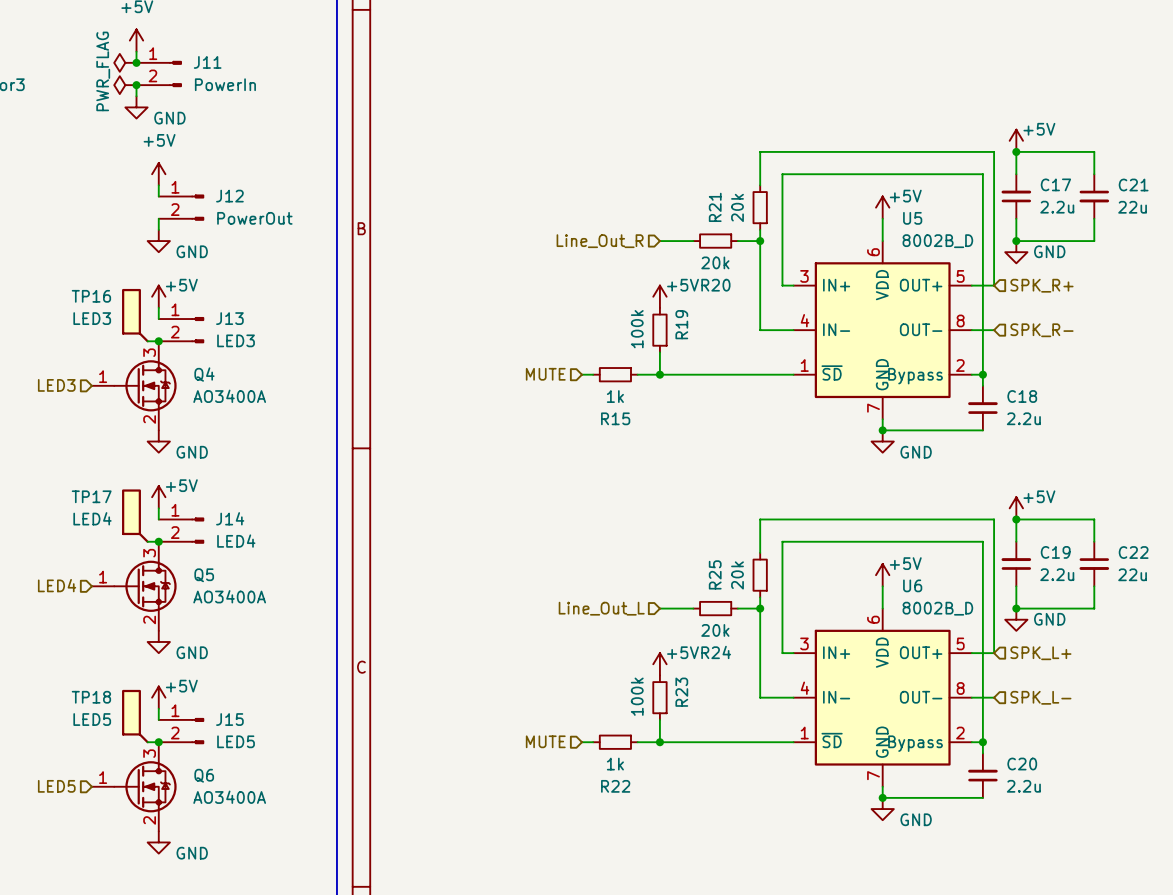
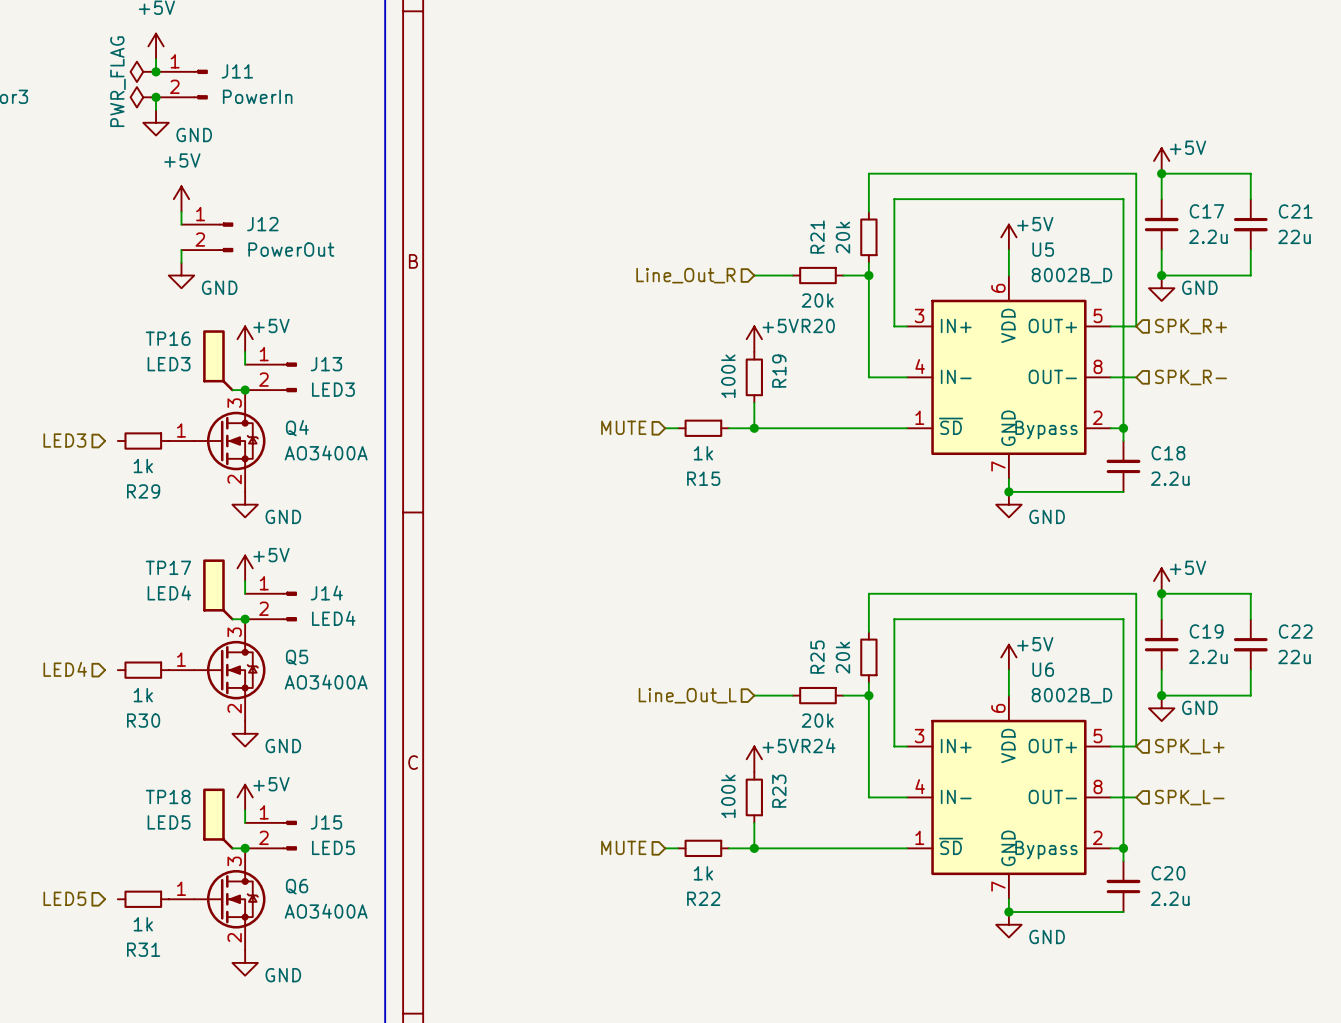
power symbol position: +5V (158, 296) -> +5V (245, 339)
wire: (158, 307) (158, 319) -> (245, 351) (245, 364)
TP16 position: (135, 315) -> (218, 360)
J13 position: (181, 330) -> (270, 377)
wire: (147, 341) (158, 341) -> (232, 390) (245, 390)
junction: (158, 341) -> none
junction: none -> (245, 390)
R29: none -> 1k (143, 441)
Q4 position: (134, 385) -> (217, 441)
power symbol position: GND (158, 441) -> GND (245, 504)
power symbol position: +5V (158, 497) -> +5V (245, 568)
wire: (158, 508) (158, 519) -> (245, 581) (245, 593)
TP17 position: (135, 516) -> (218, 589)
J14 position: (181, 530) -> (270, 606)
wire: (147, 541) (158, 541) -> (232, 619) (245, 619)
junction: (158, 541) -> none
junction: none -> (245, 619)
R30: none -> 1k (143, 670)
Q5 position: (134, 586) -> (217, 670)
power symbol position: GND (158, 641) -> GND (245, 733)
power symbol position: +5V (158, 697) -> +5V (245, 797)
wire: (158, 708) (158, 719) -> (245, 810) (245, 822)
TP18 position: (135, 716) -> (218, 819)
J15 position: (181, 731) -> (270, 835)
wire: (147, 742) (158, 742) -> (232, 848) (245, 848)
junction: (158, 742) -> none
junction: none -> (245, 848)
R31: none -> 1k (143, 899)
Q6 position: (134, 786) -> (217, 899)
power symbol position: GND (158, 842) -> GND (245, 962)

